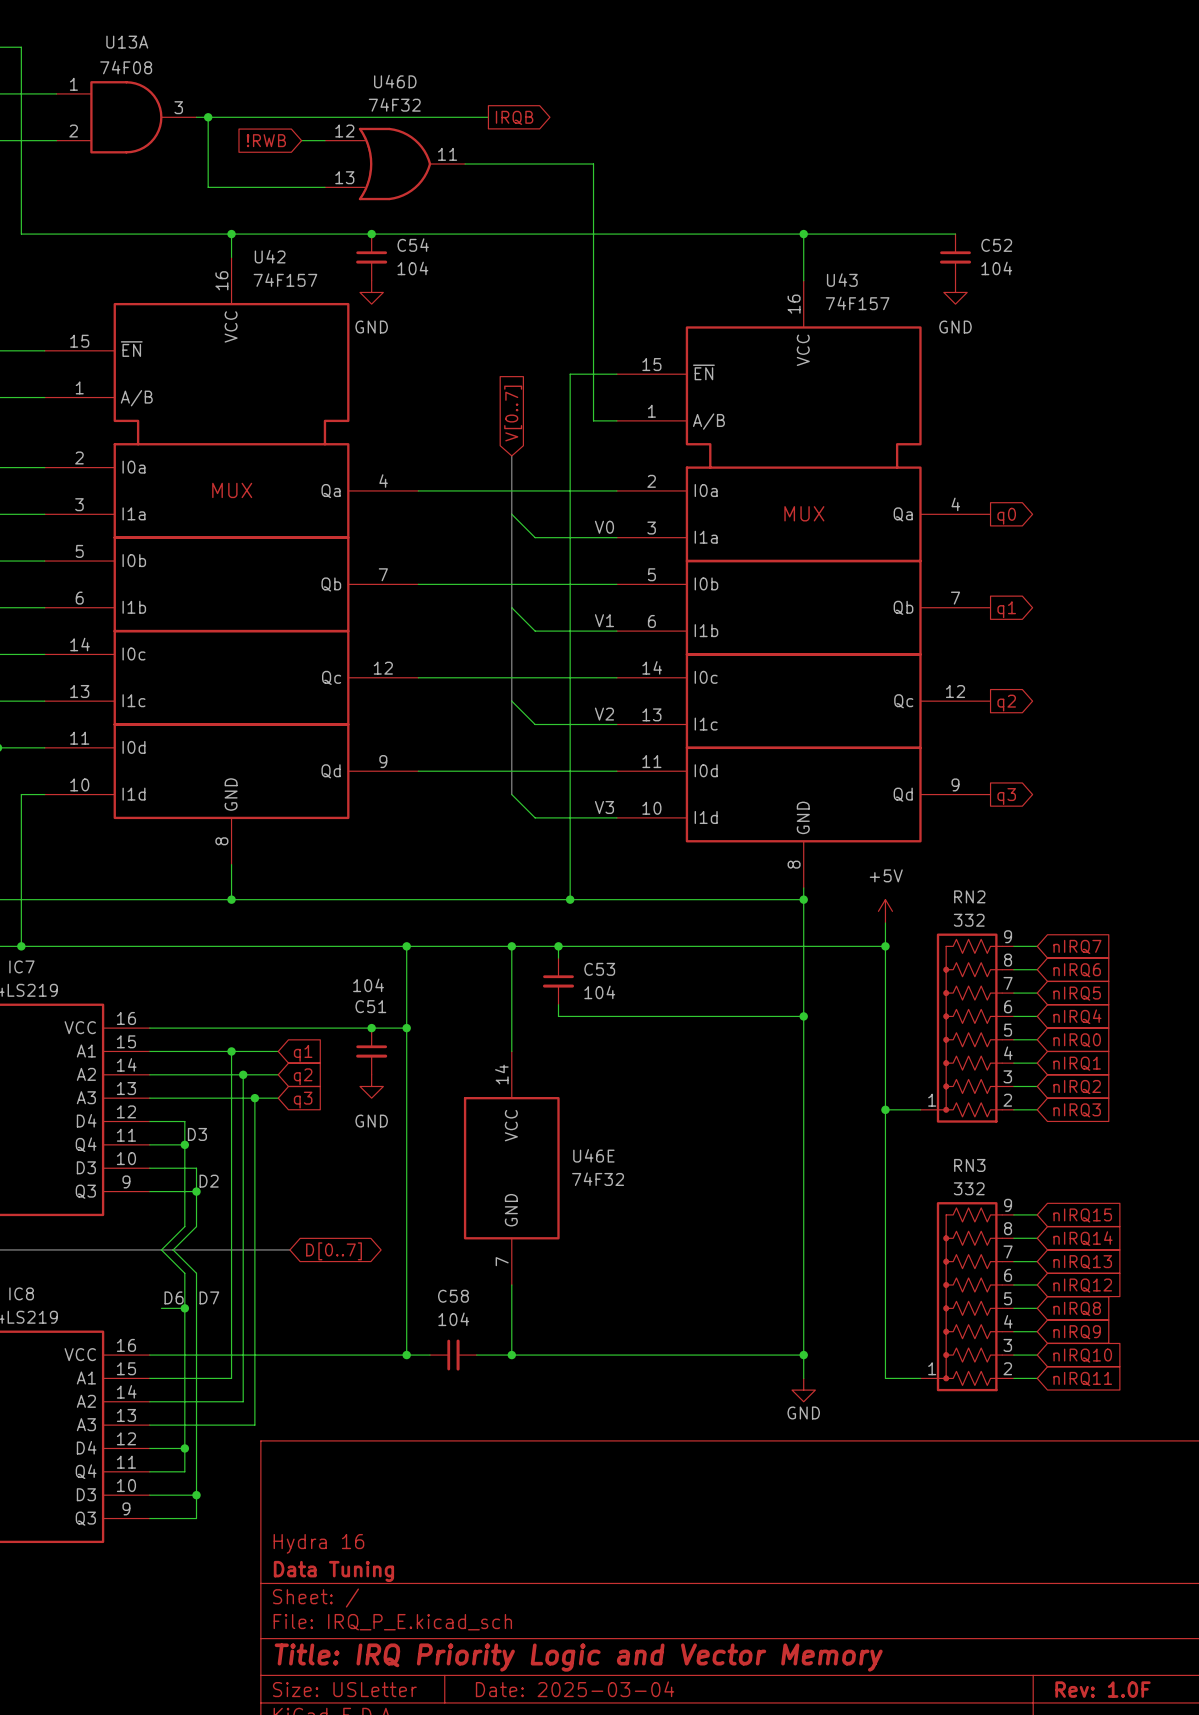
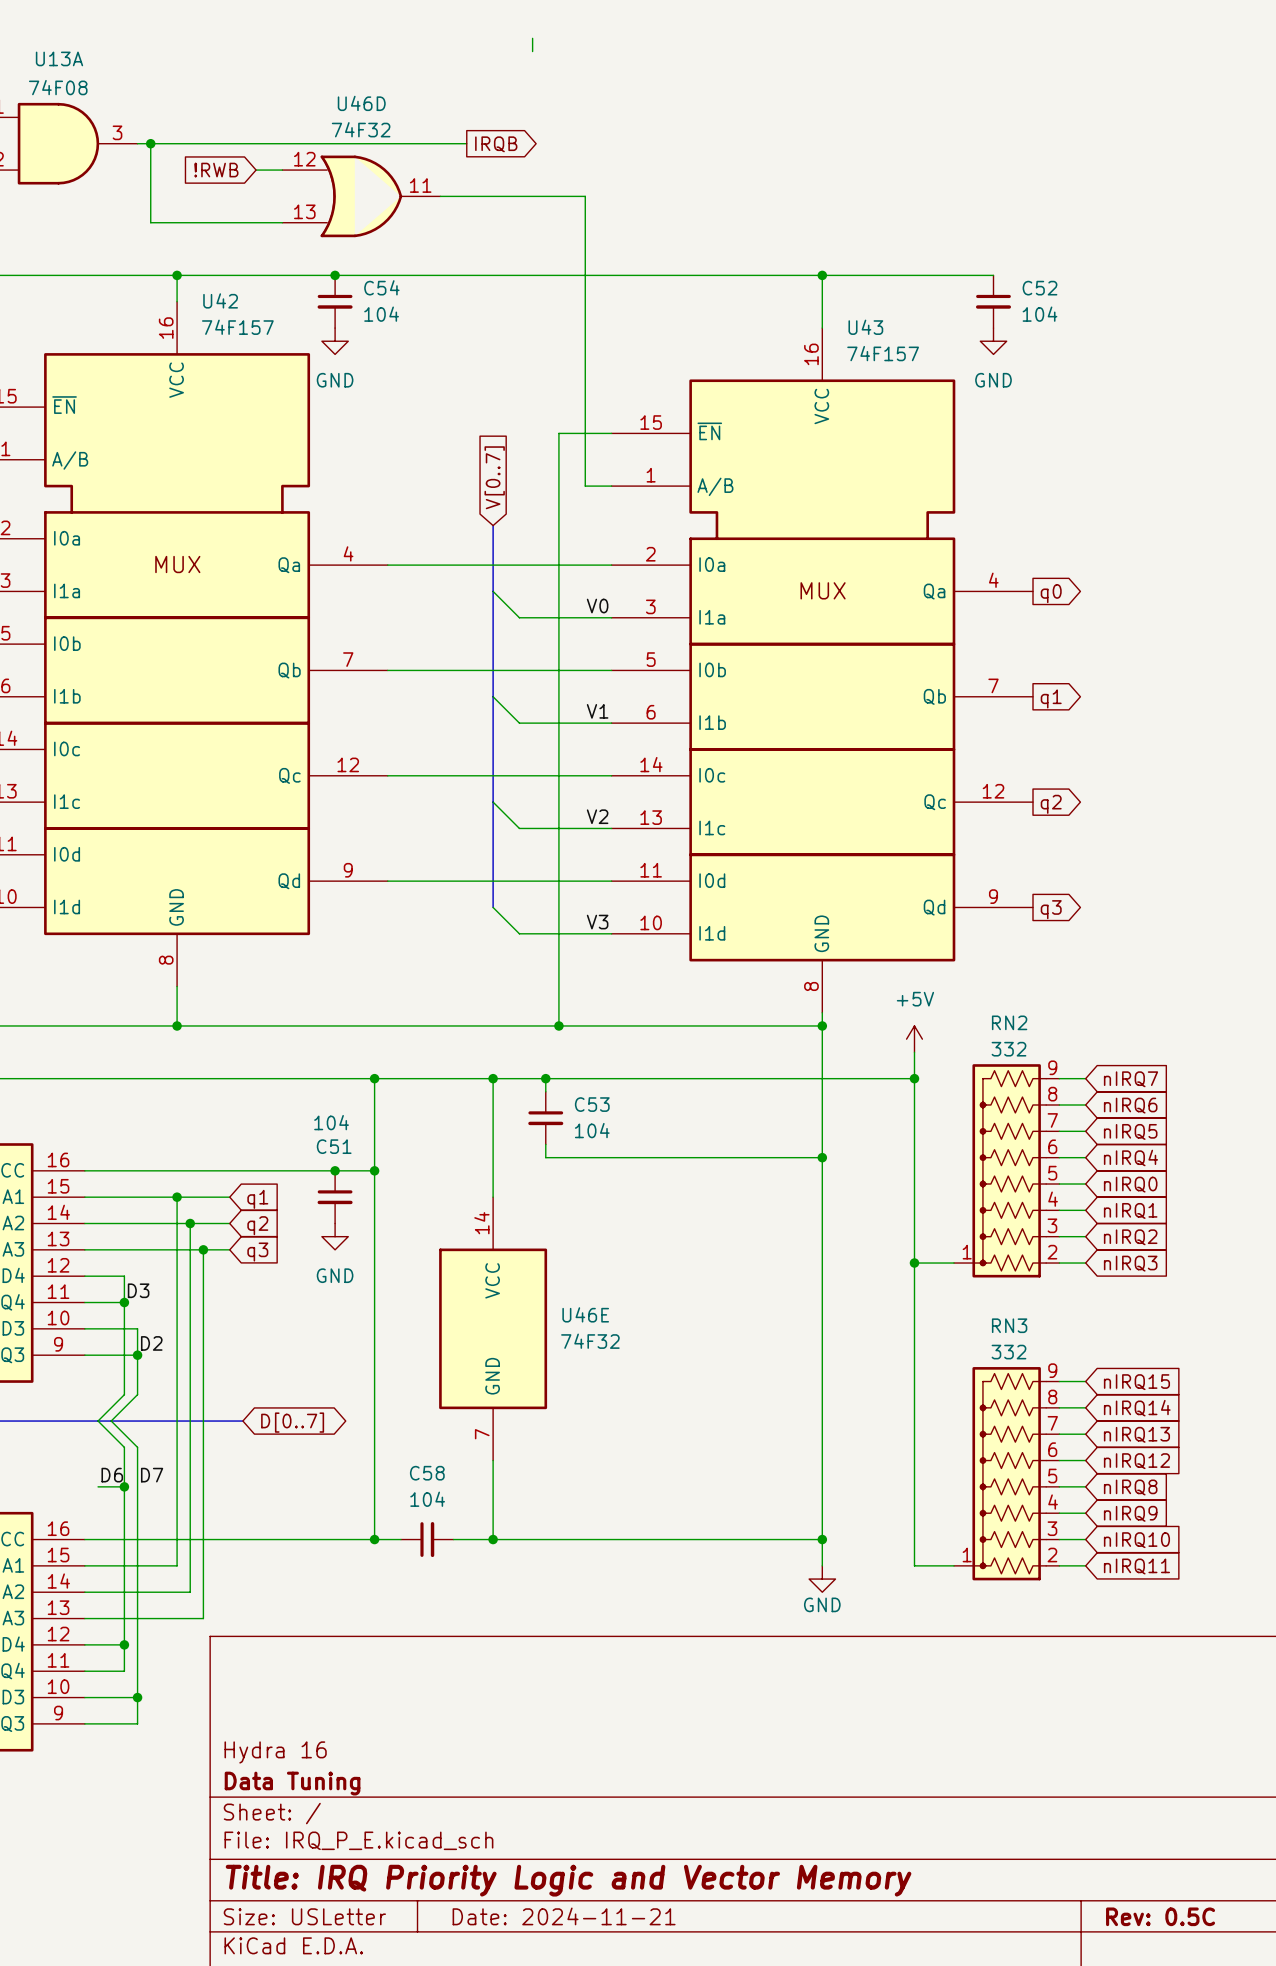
wire: none -> (532, 38) (532, 51)
title block: Date: 2025-03-04 (575, 1689) -> Date: 2024-11-21 (564, 1916)
title block: Rev: 1.0F (1102, 1689) -> Rev: 0.5C (1160, 1916)

